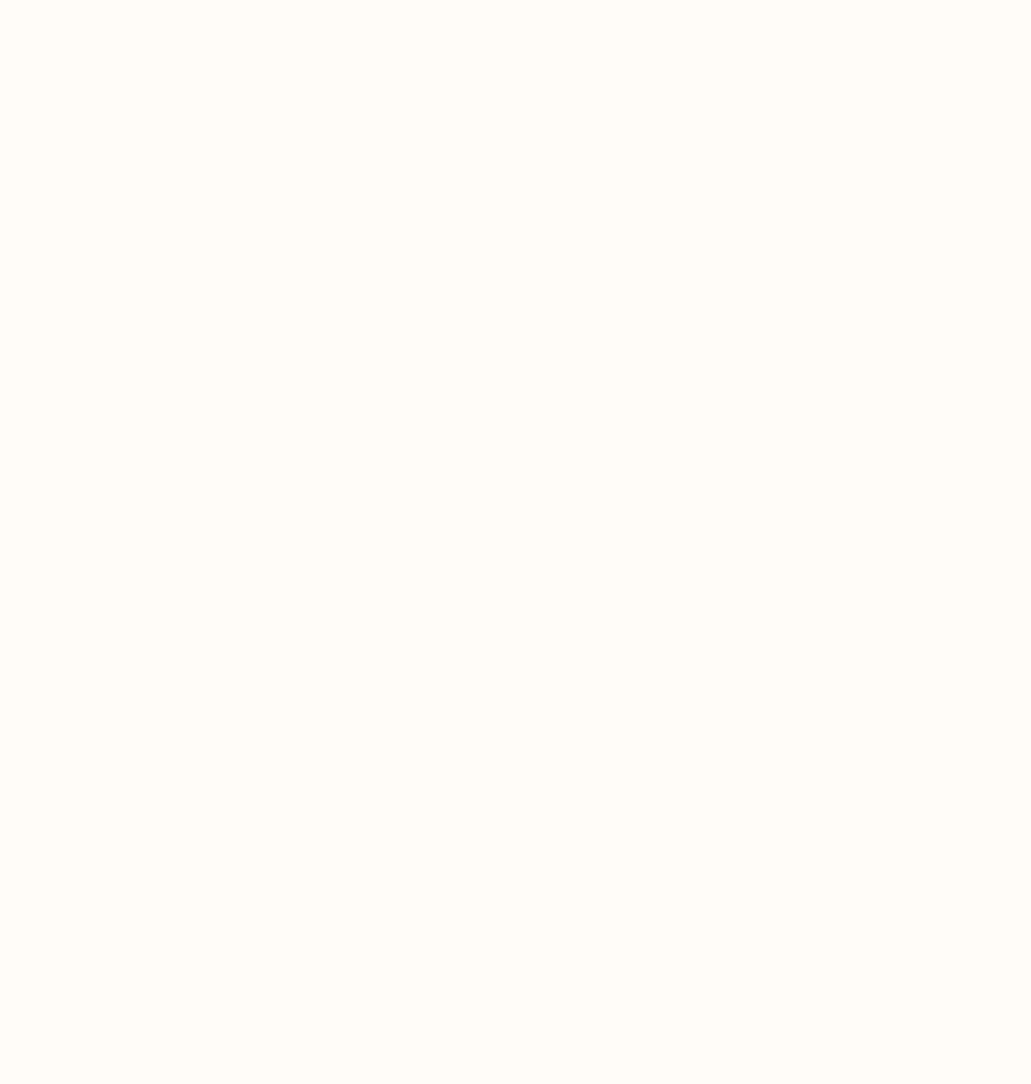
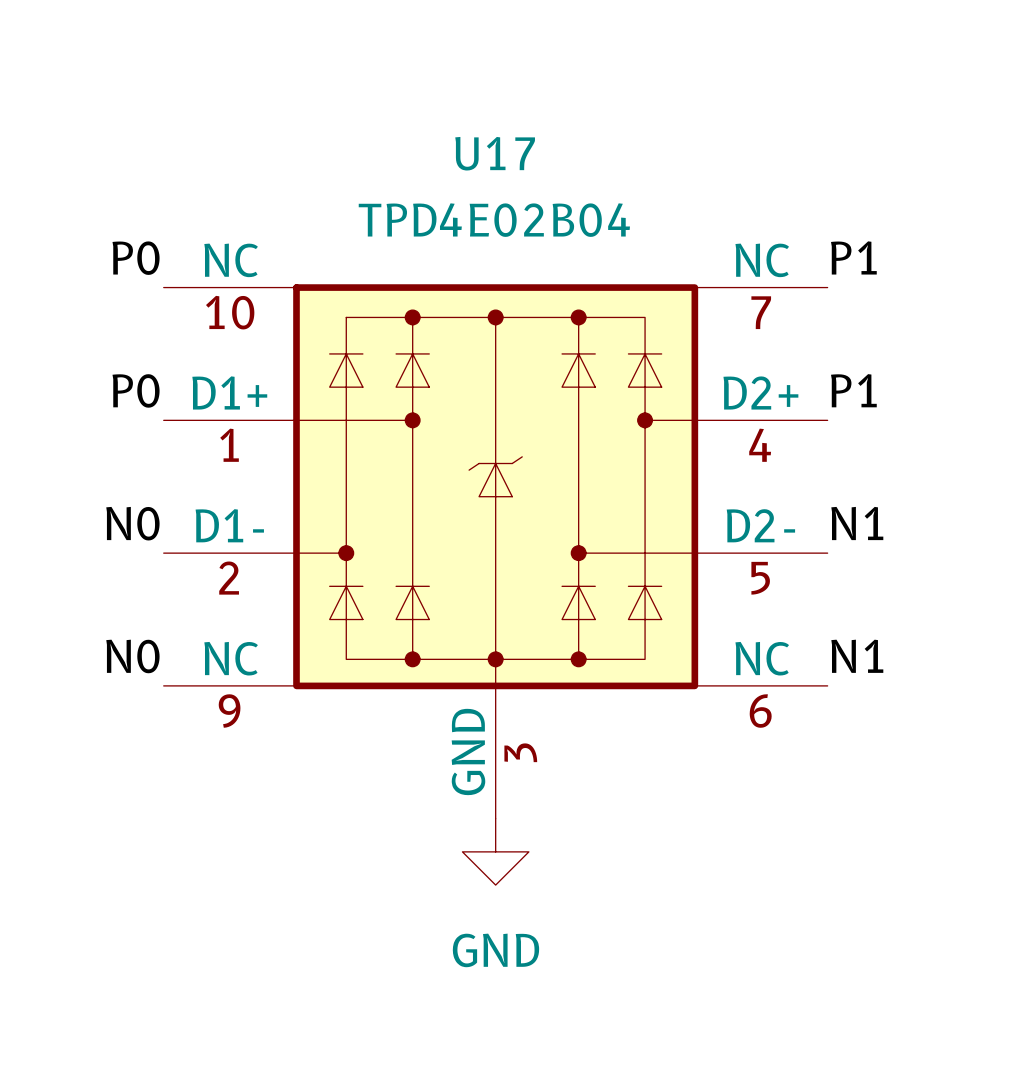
label: none -> P0 (136, 258)
label: none -> P1 (853, 257)
label: none -> P0 (136, 390)
label: none -> P1 (853, 390)
label: none -> N0 (132, 523)
label: none -> N1 (857, 523)
U17: none -> TPD4E02B04 (495, 551)
label: none -> N0 (132, 656)
label: none -> N1 (857, 656)
power symbol: none -> GND (495, 851)

